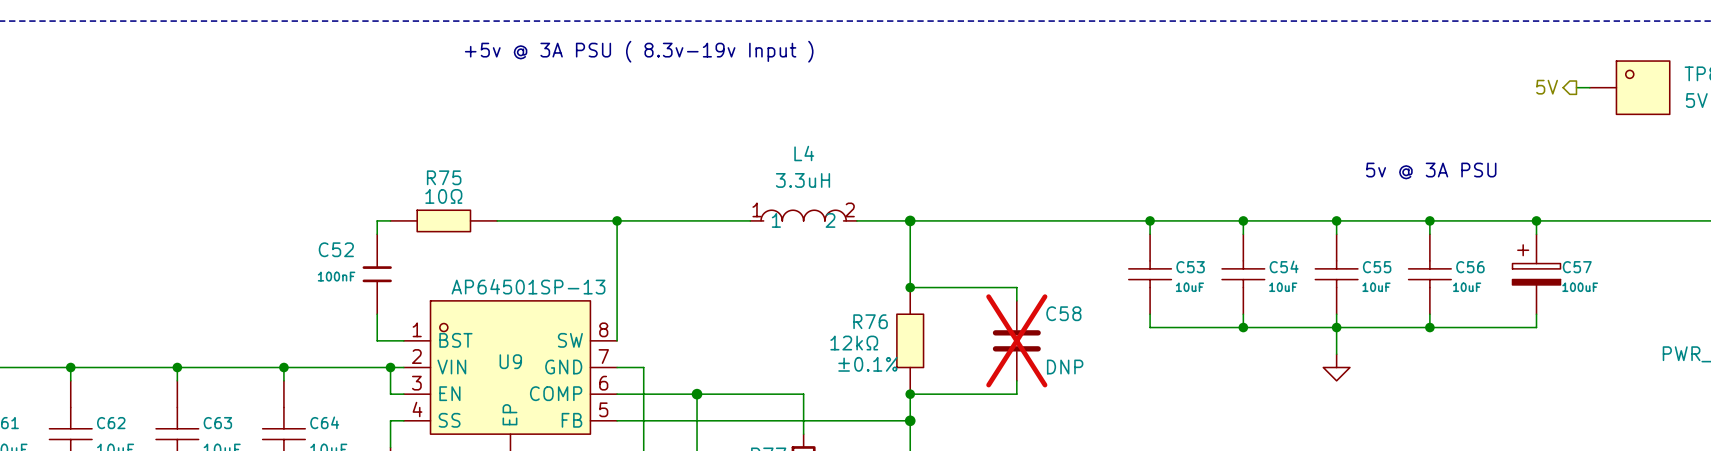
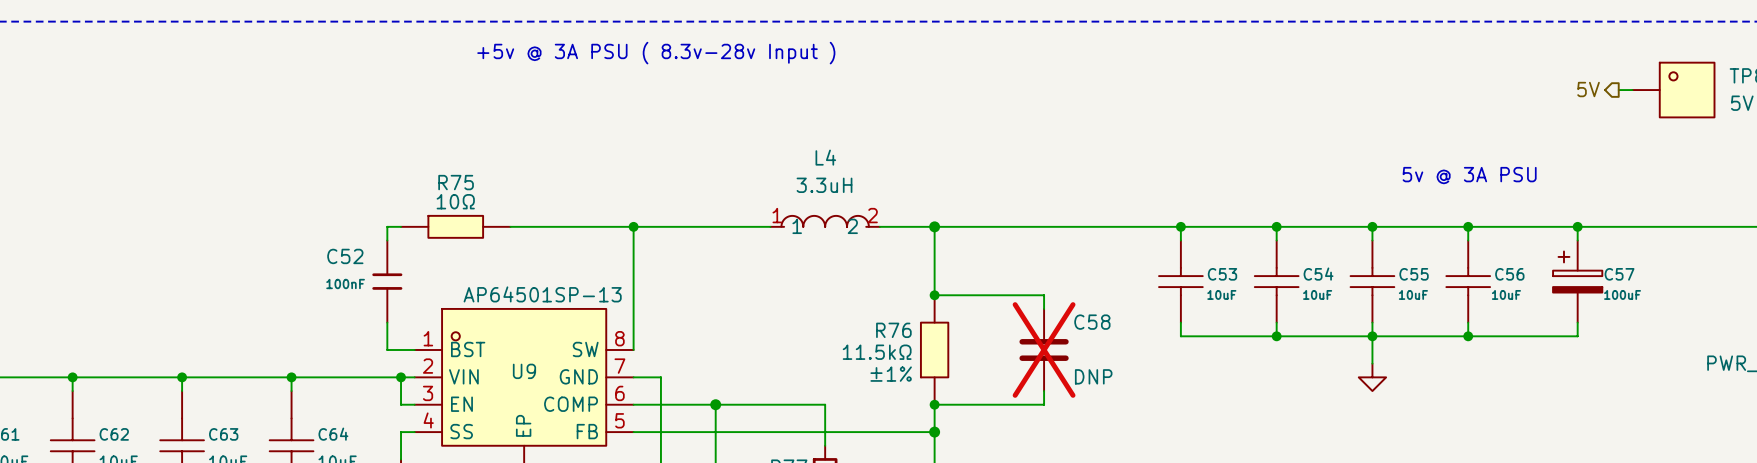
text: +5v @ 3A PSU ( 8.3v-19v Input ) (639, 51) -> +5v @ 3A PSU ( 8.3v-28v Input ) (656, 53)
R76 value: 12kΩ (854, 343) -> 11.5kΩ (877, 352)
R76 text: ±0.1% (867, 364) -> ±1% (891, 374)

